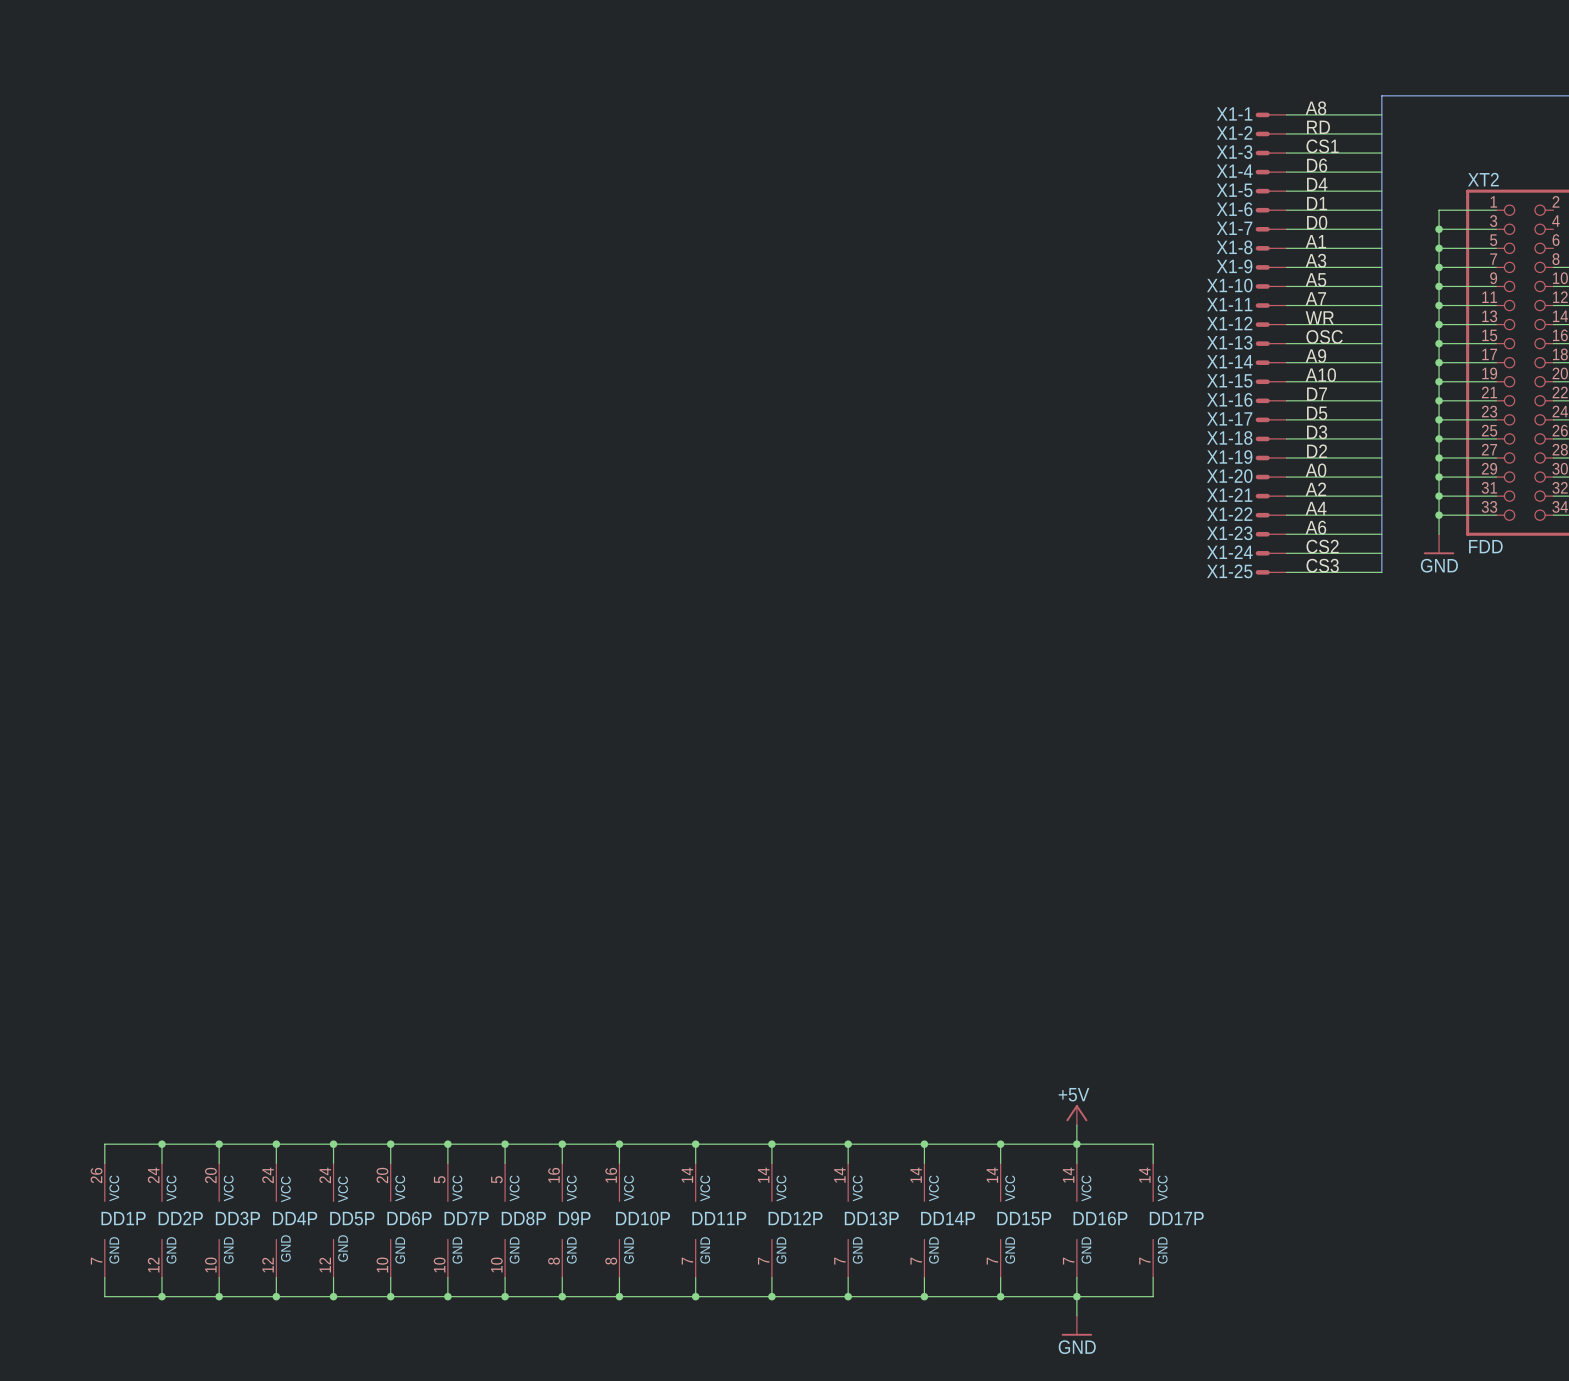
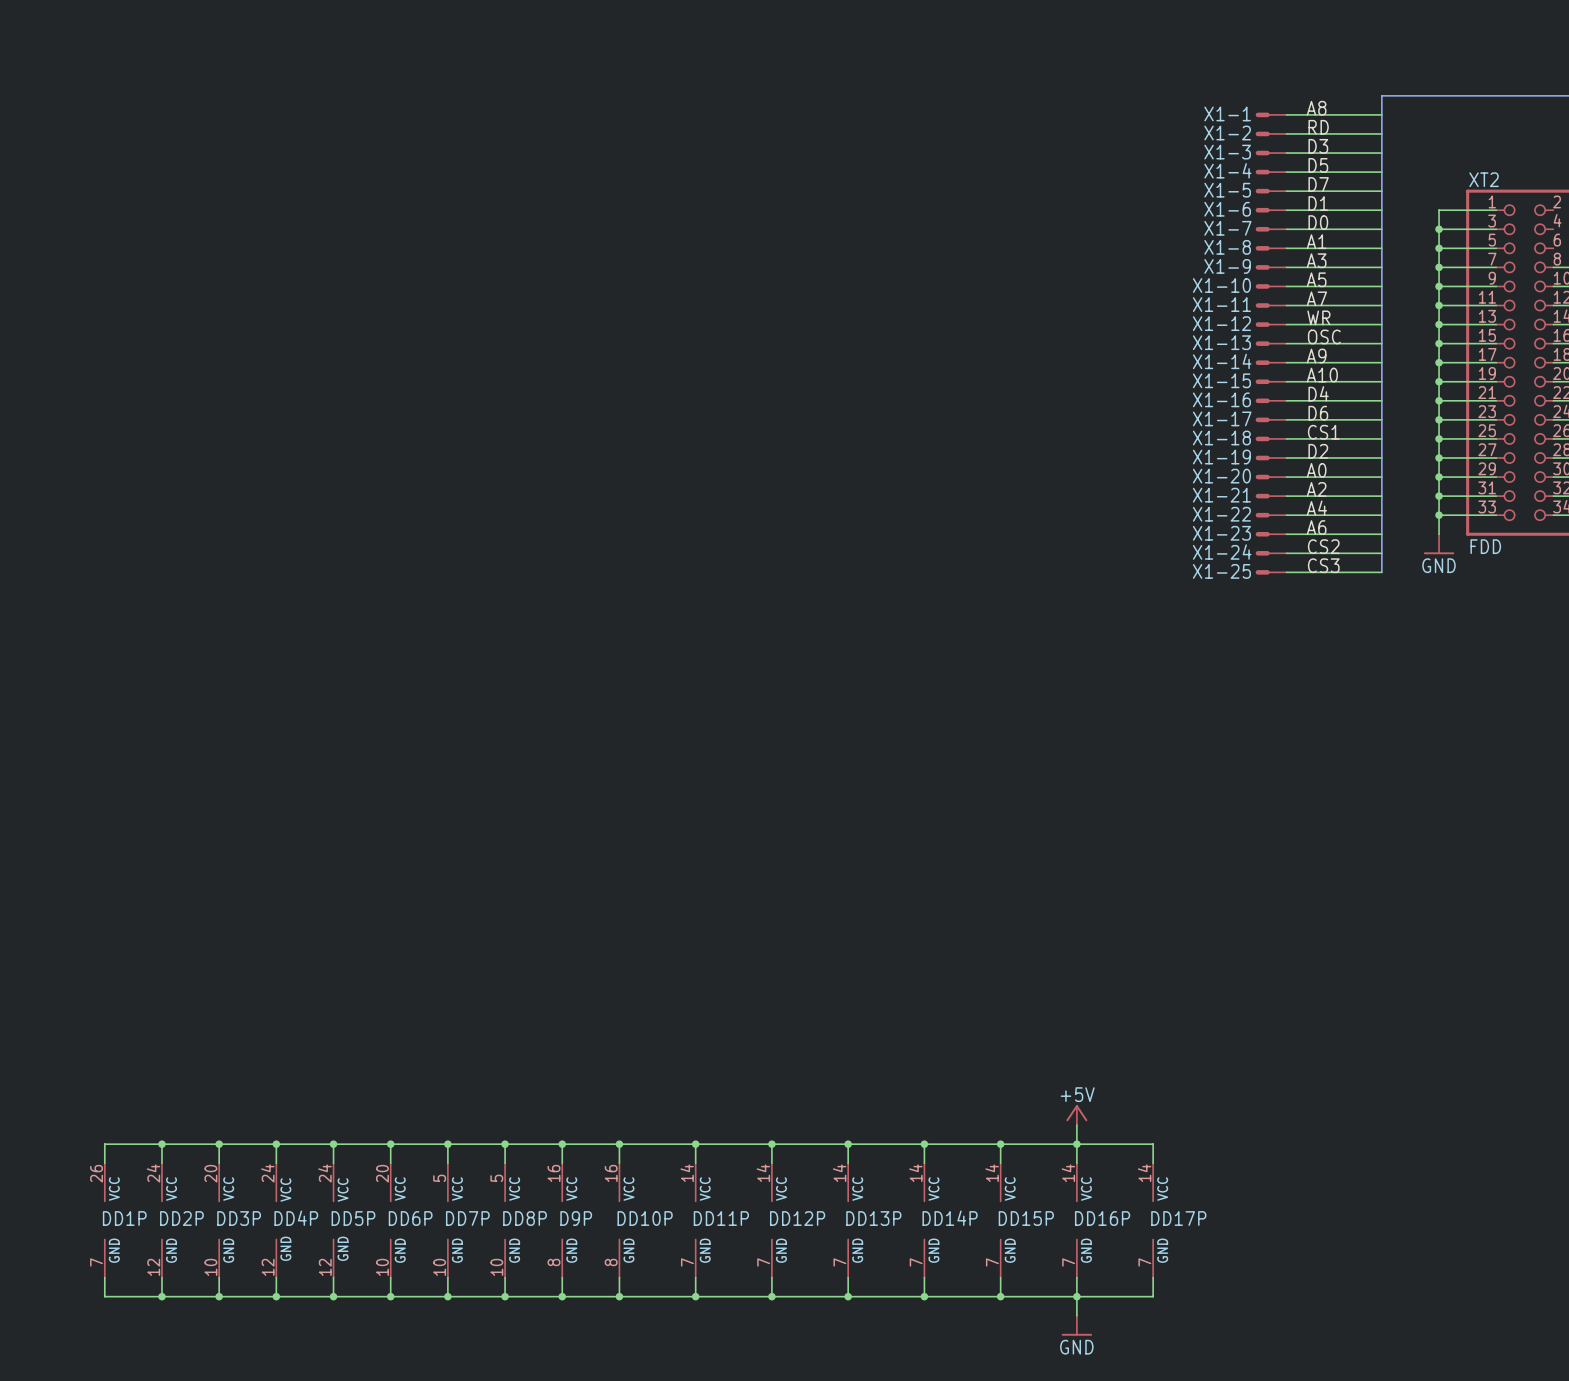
label: CS1 (1322, 146) -> D3 (1318, 146)
label: D6 (1317, 165) -> D5 (1318, 165)
label: D4 (1317, 184) -> D7 (1318, 184)
label: D7 (1317, 394) -> D4 (1318, 393)
label: D5 (1317, 413) -> D6 (1318, 413)
label: D3 (1317, 432) -> CS1 (1323, 432)

